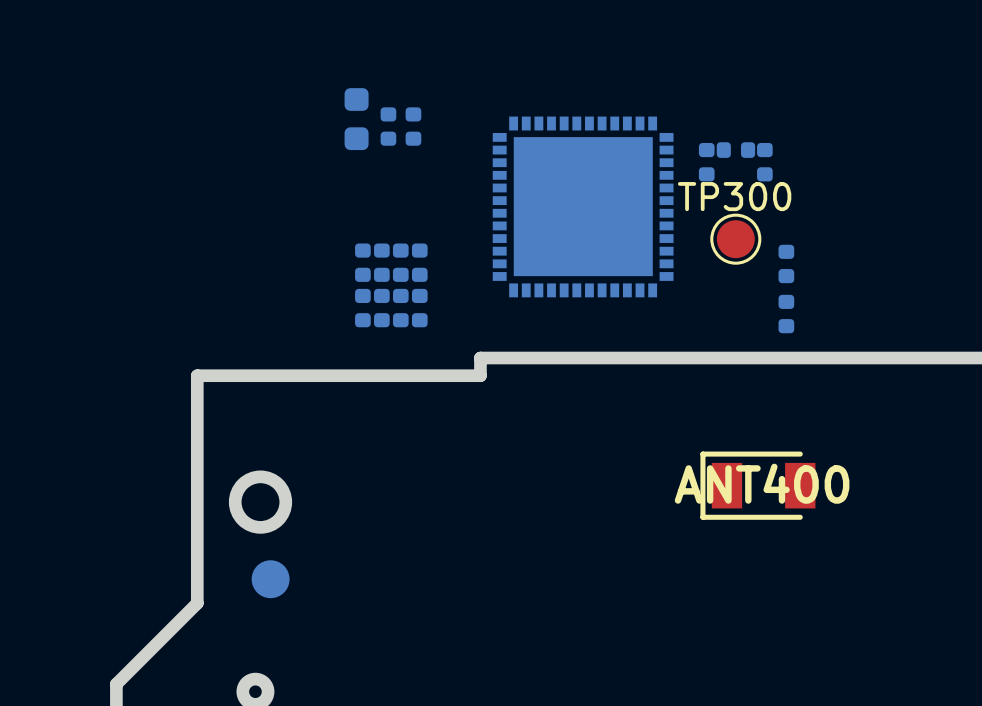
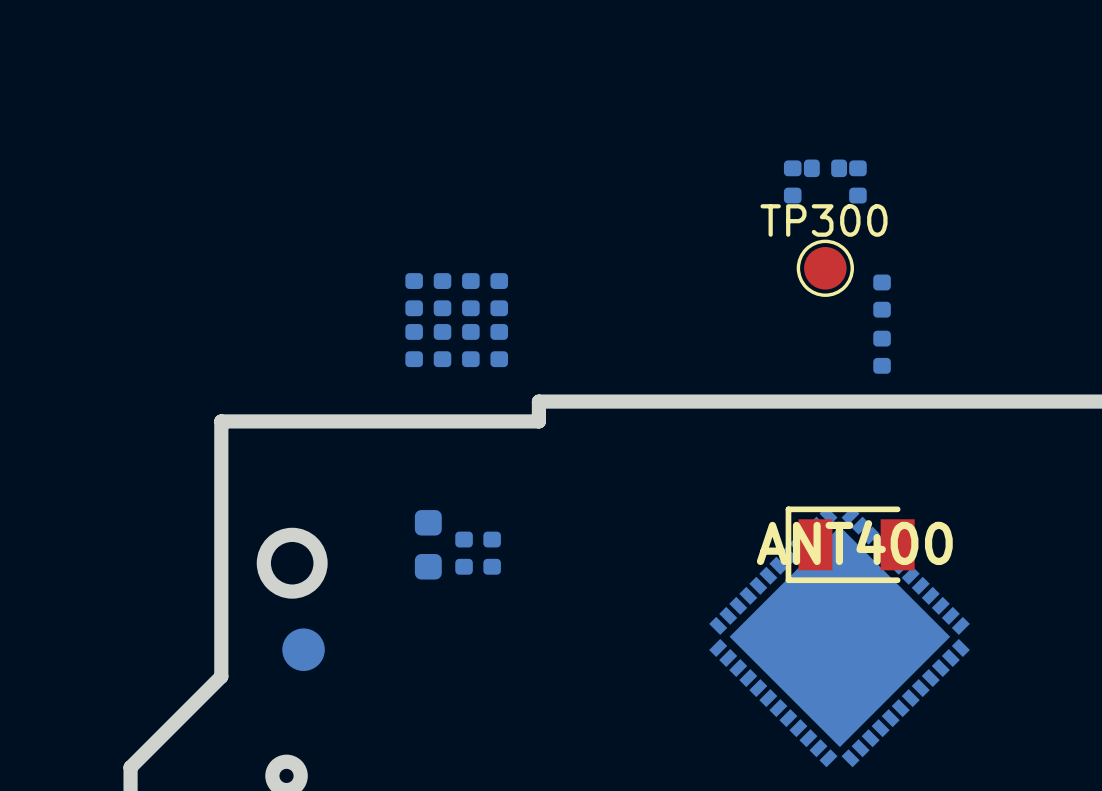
part position: (356, 119) -> (428, 544)
part: (388, 126) -> none
part: (413, 126) -> none
part: (583, 206) -> none
part: (362, 262) -> none
part: none -> (414, 294)
part: (381, 262) -> none
part: none -> (442, 294)
part: (400, 262) -> none
part: none -> (499, 294)
part: (362, 308) -> none
part: none -> (414, 345)
part: (381, 308) -> none
part: none -> (442, 345)
part: (400, 308) -> none
part: none -> (499, 345)
part: none -> (464, 553)
part: none -> (492, 553)
part: none -> (839, 636)

